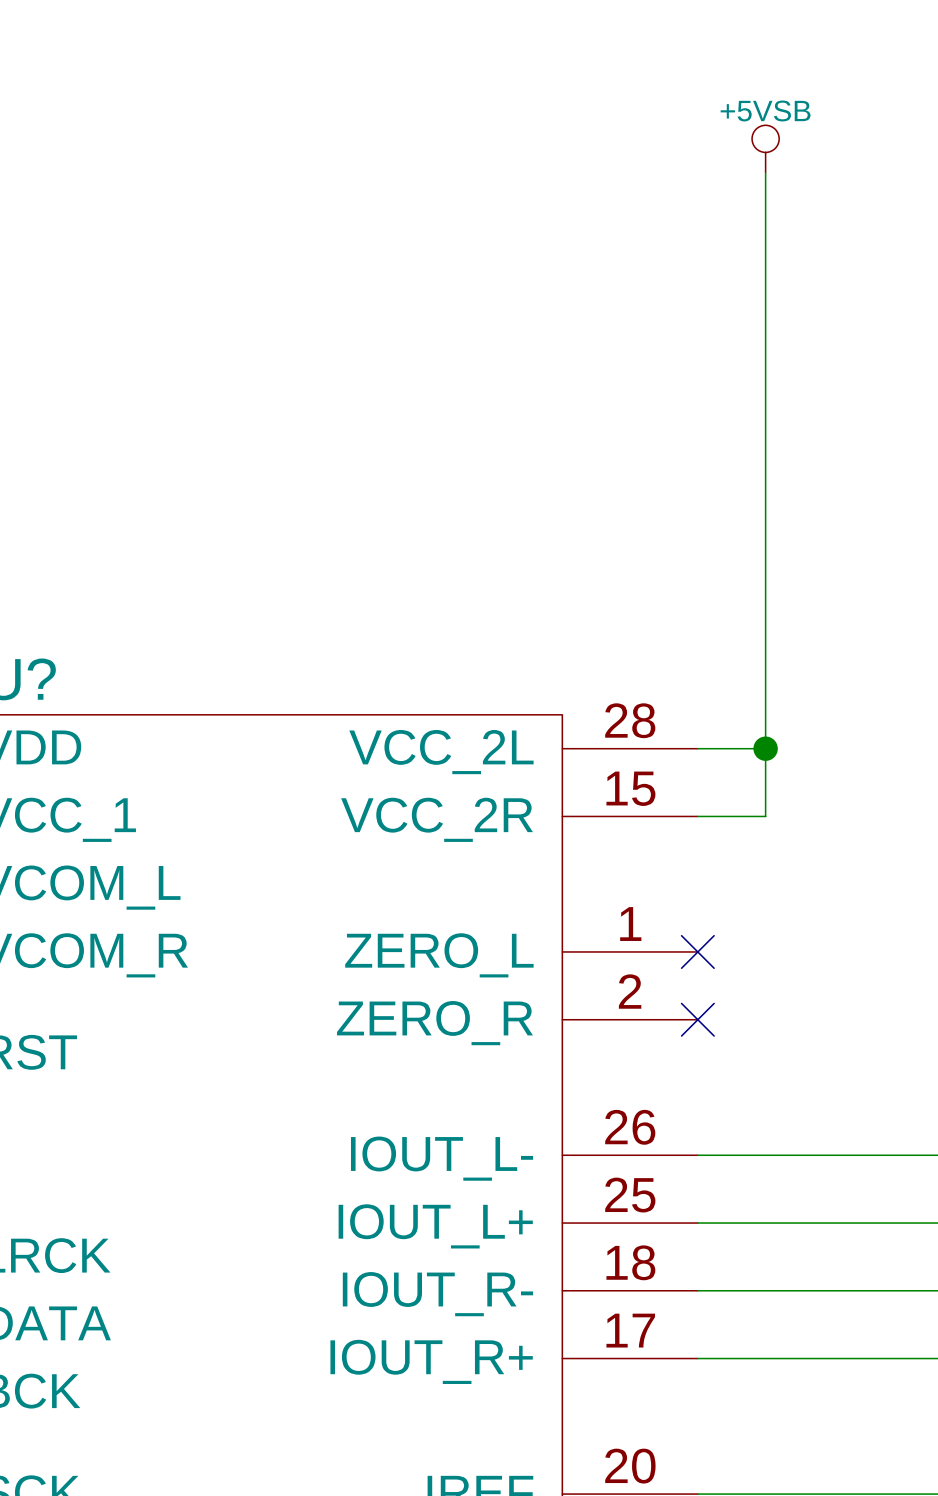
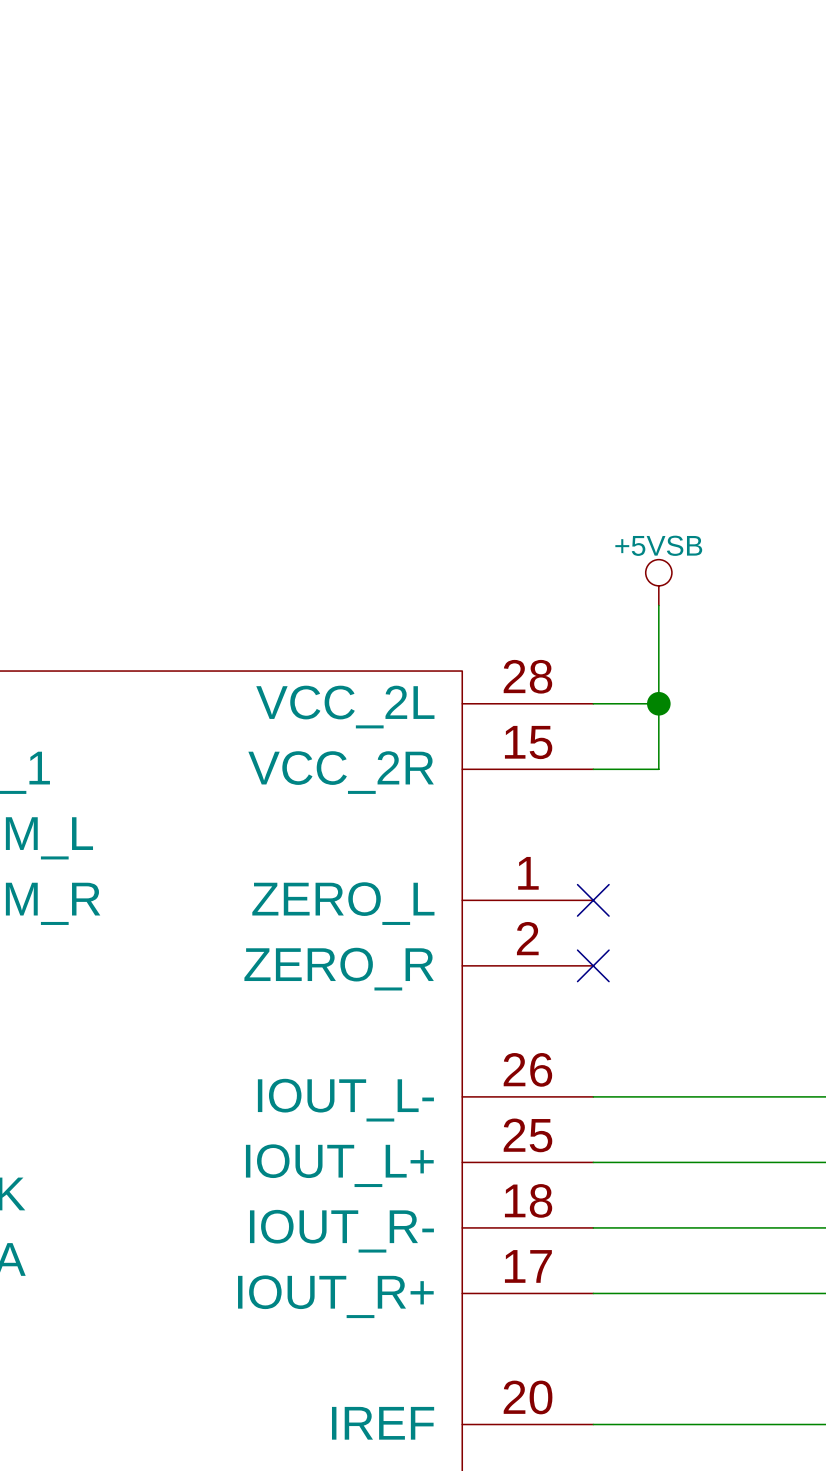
power symbol position: +5VSB (765, 149) -> +5VSB (658, 582)
wire: (765, 172) (765, 647) -> none

